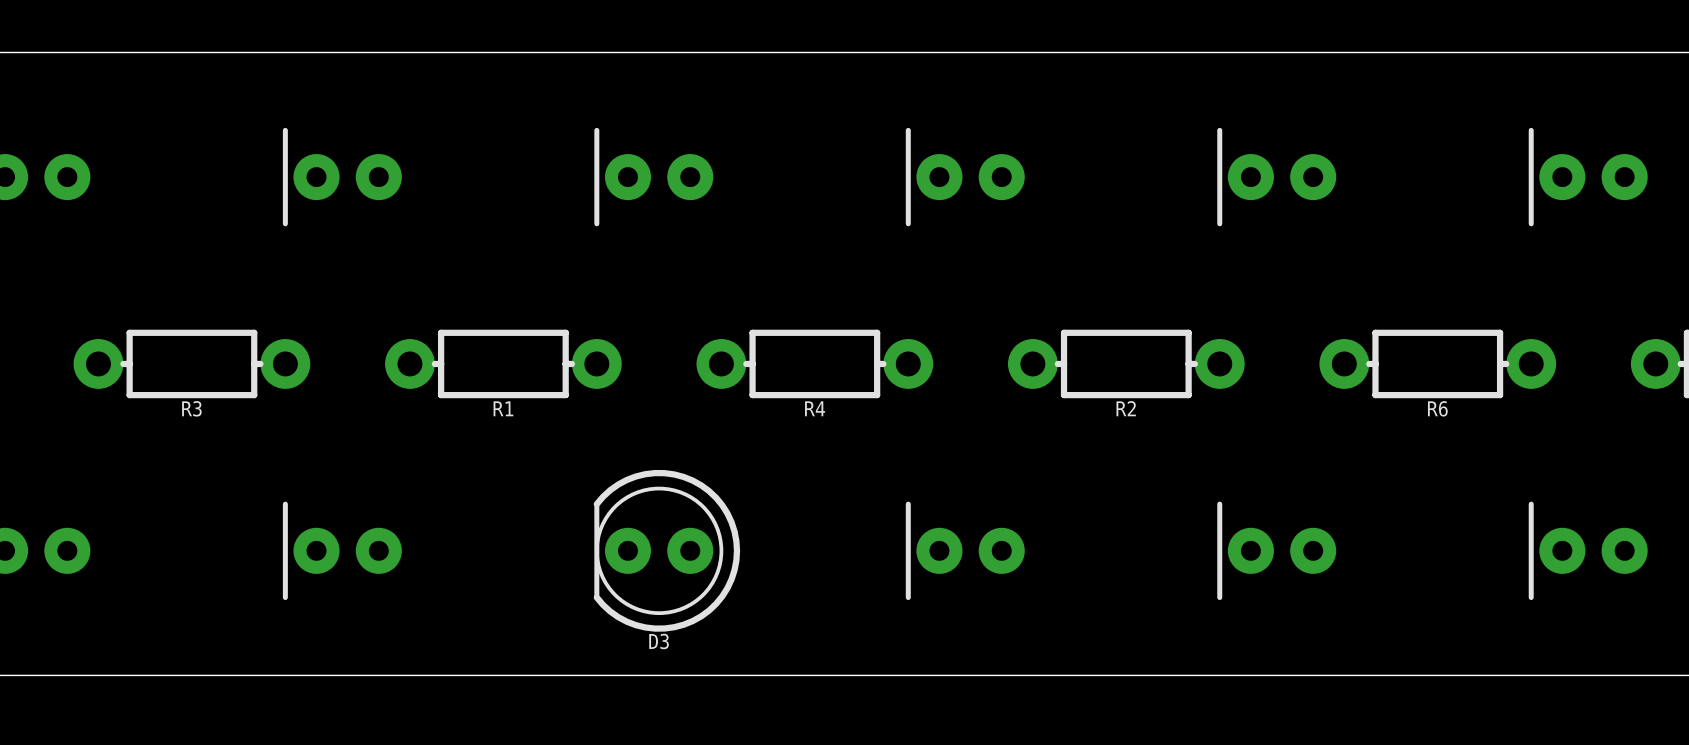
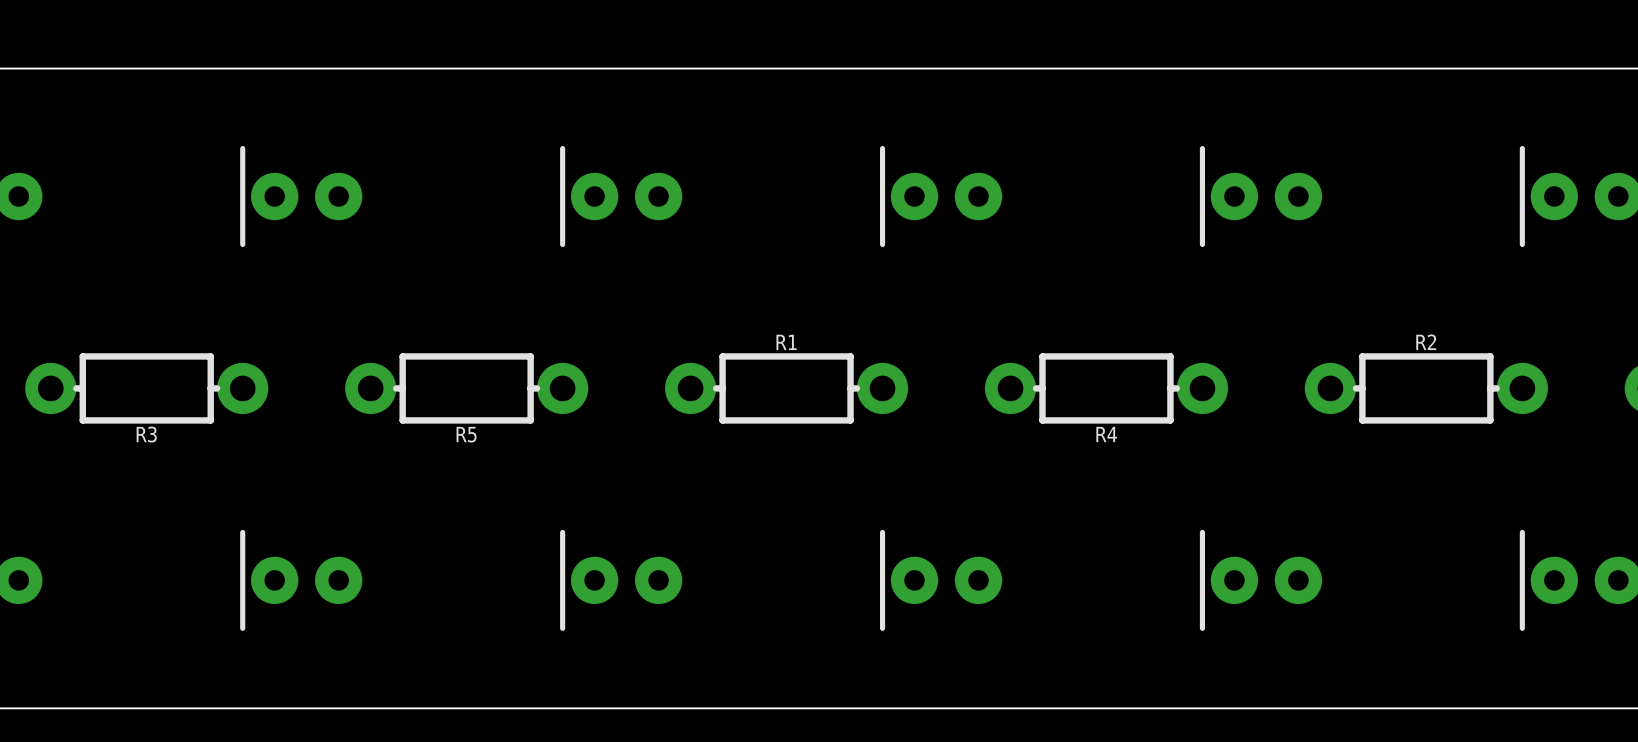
R1 name: R1 (503, 408) -> R5 (466, 434)
R4 name: R4 (815, 408) -> R1 (786, 342)
R2 name: R2 (1126, 408) -> R4 (1106, 434)
R6 name: R6 (1437, 408) -> R2 (1426, 342)
D3 side: top (666, 550) -> bottom (621, 580)

